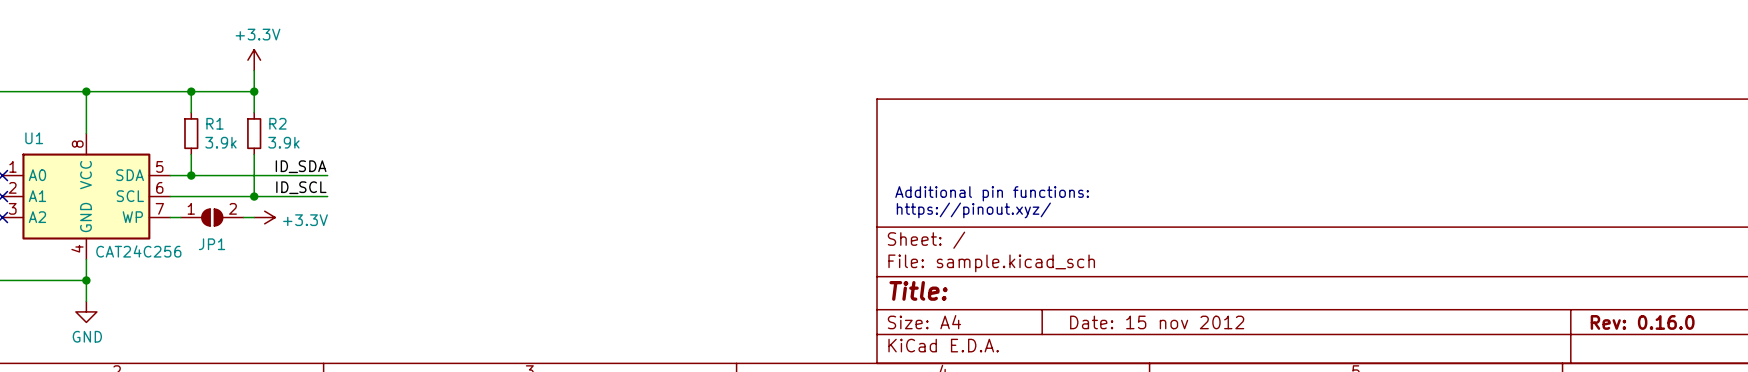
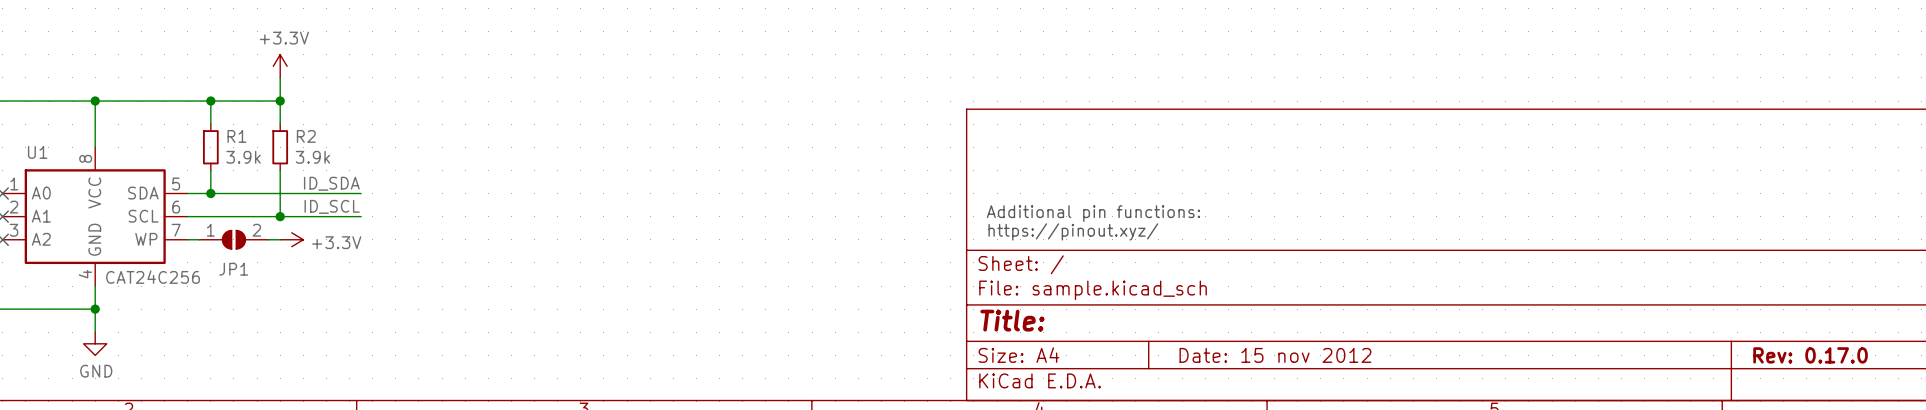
title block: Rev: 0.16.0 (1642, 322) -> Rev: 0.17.0 (1810, 355)

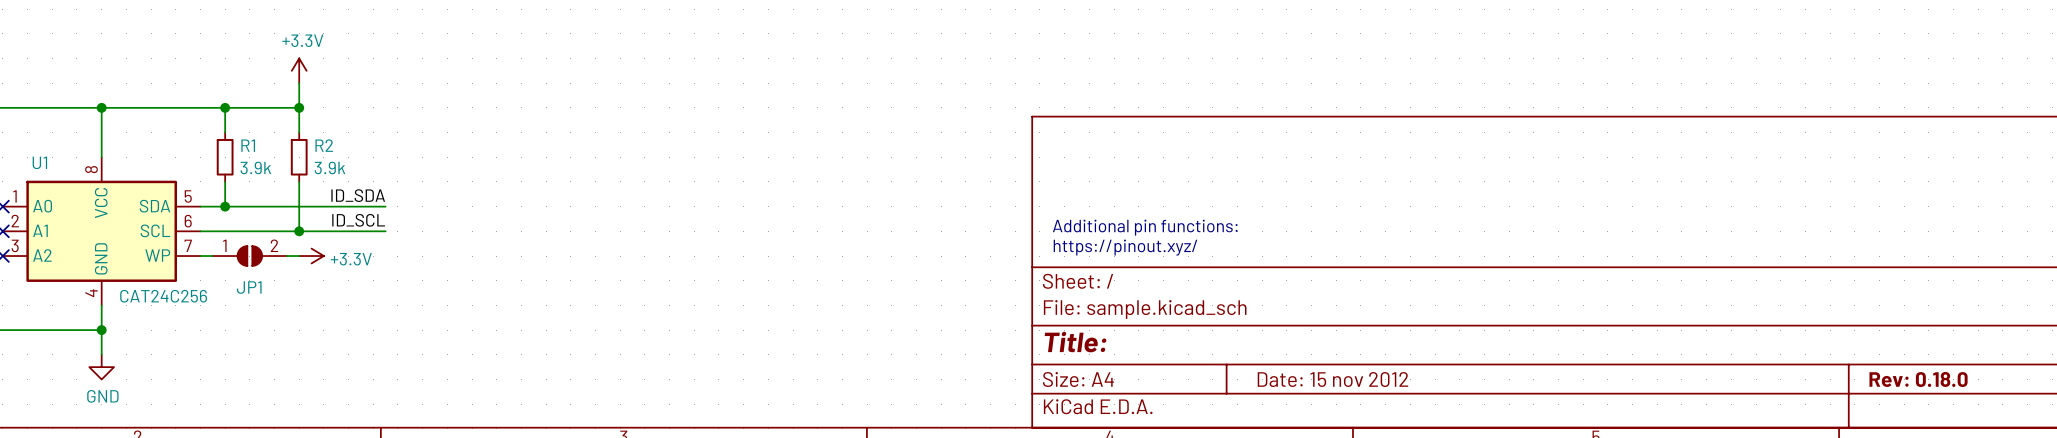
title block: Rev: 0.17.0 (1810, 355) -> Rev: 0.18.0 (1918, 379)

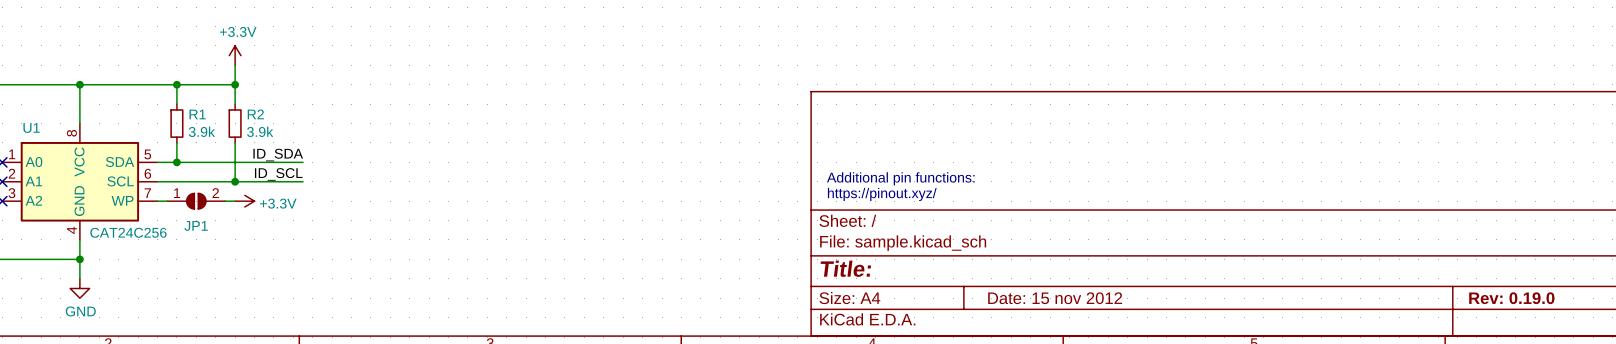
title block: Rev: 0.18.0 (1918, 379) -> Rev: 0.19.0 (1511, 298)

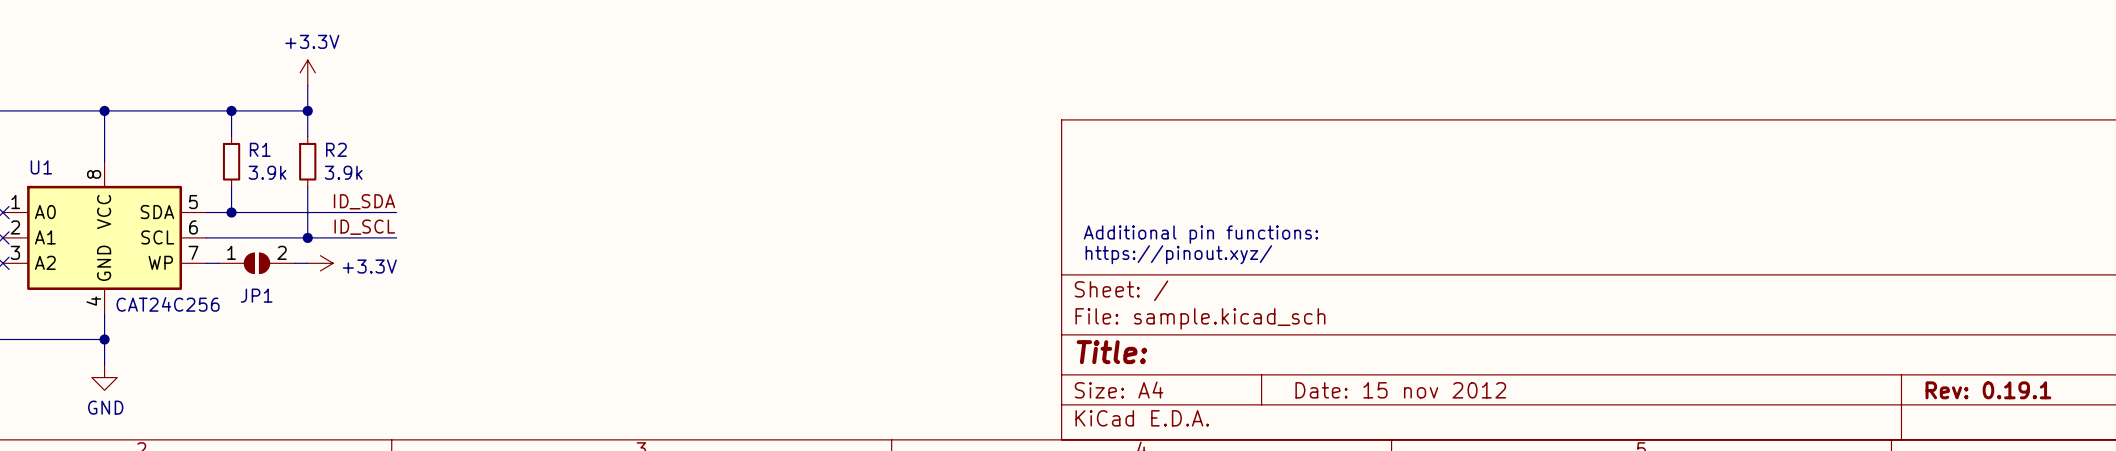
title block: Rev: 0.19.0 (1511, 298) -> Rev: 0.19.1 (1988, 390)

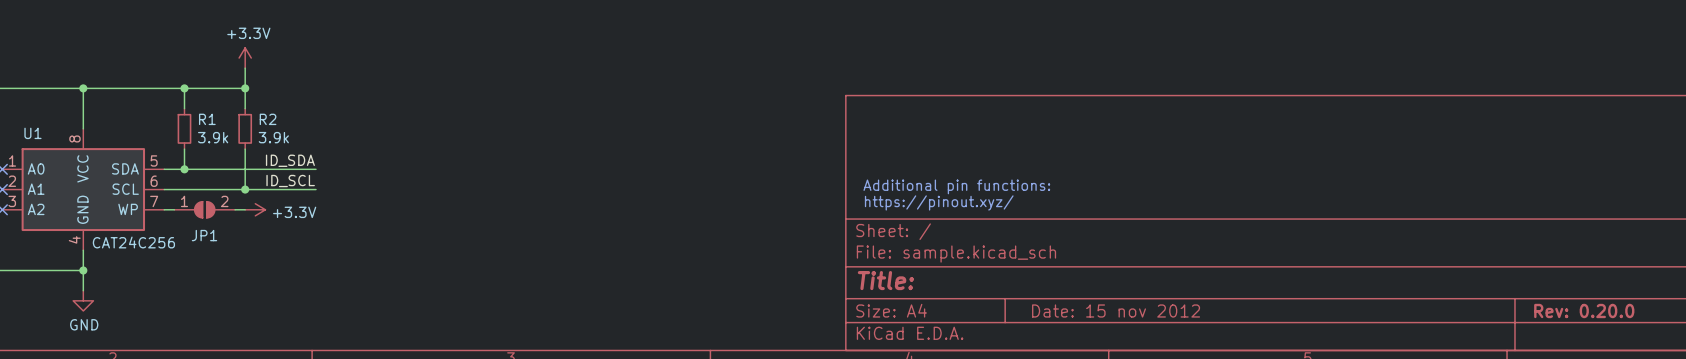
title block: Rev: 0.19.1 (1988, 390) -> Rev: 0.20.0 (1584, 310)

